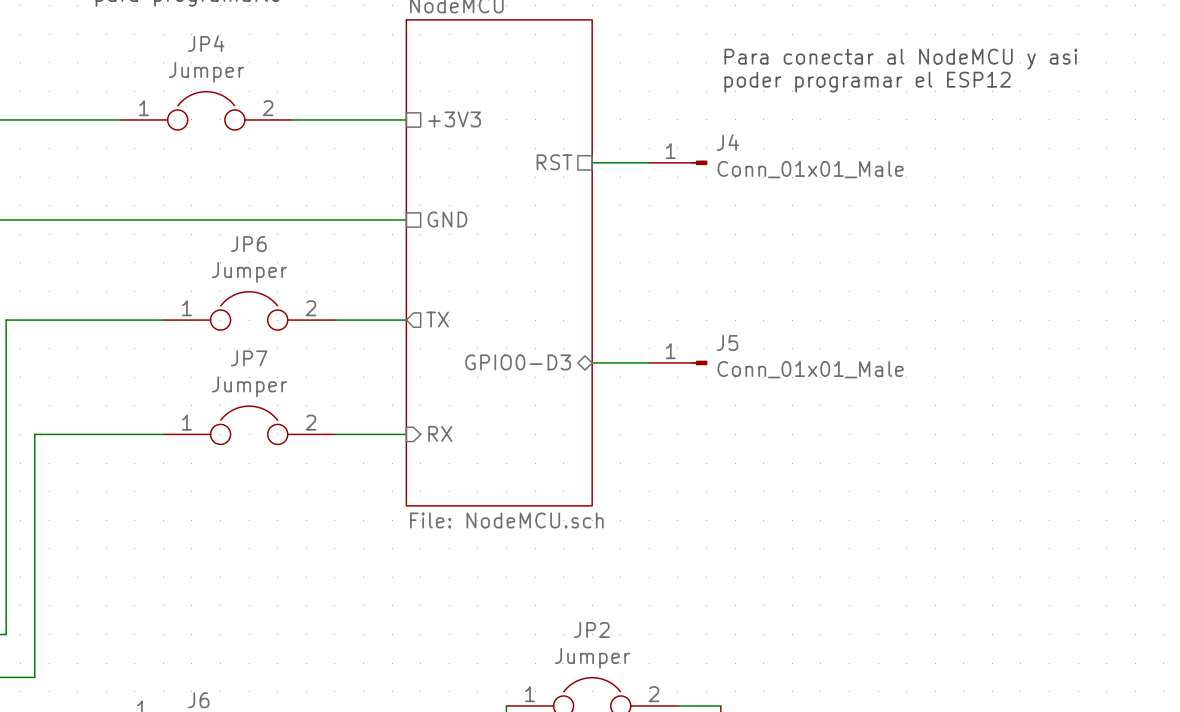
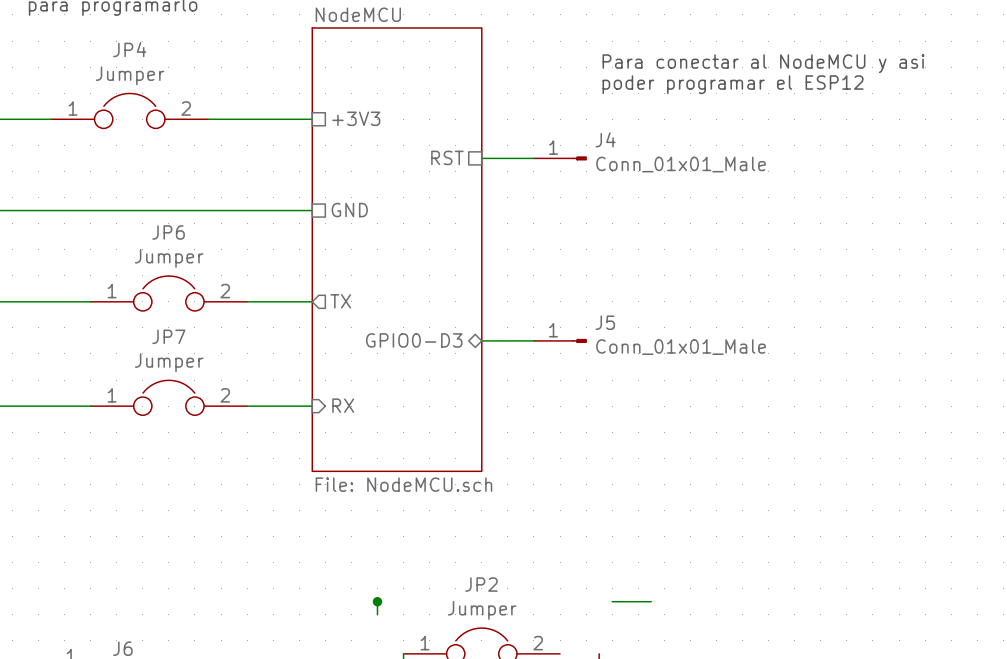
wire: none -> (377, 601) (377, 614)
junction: none -> (377, 601)
wire: (677, 705) (720, 705) -> (612, 601) (651, 601)

